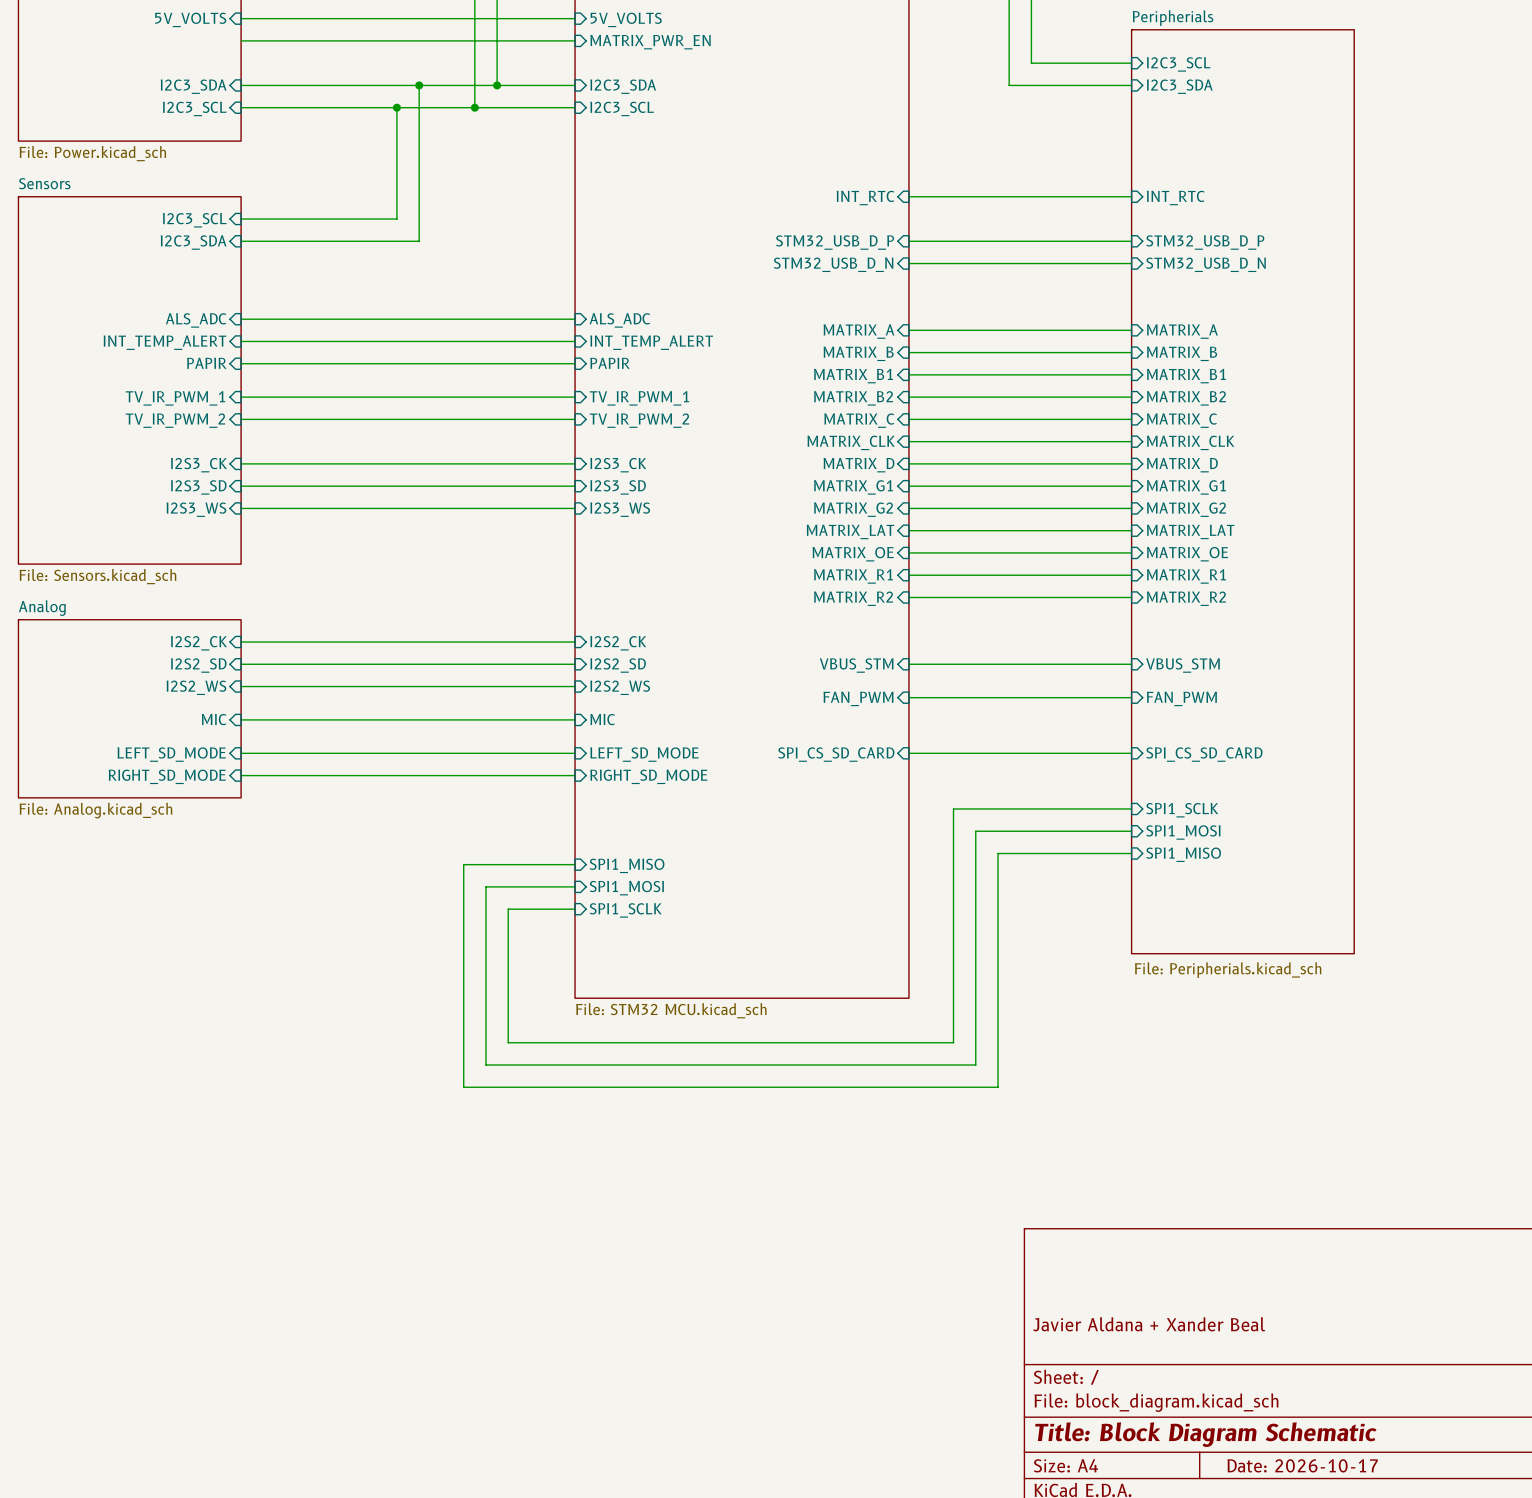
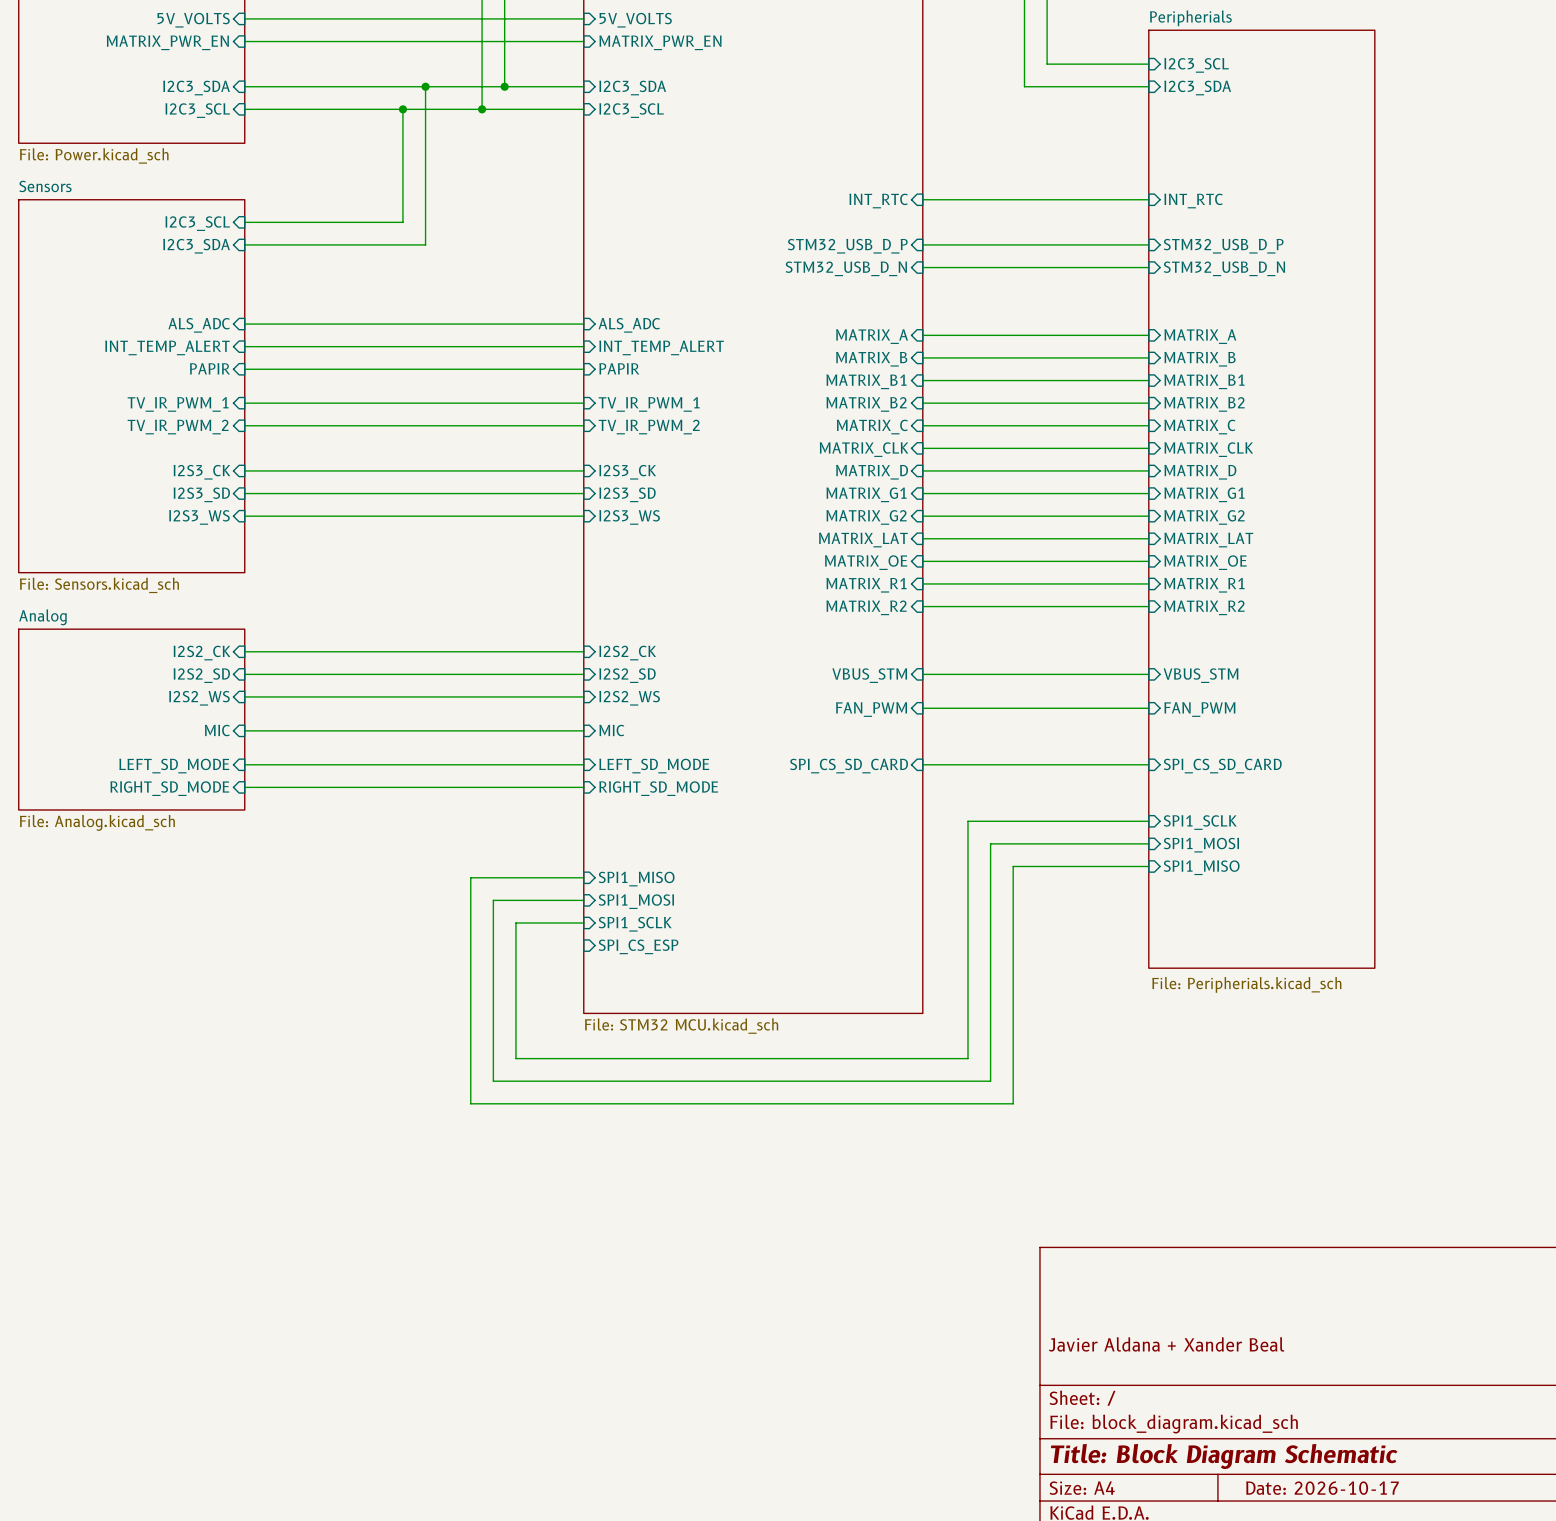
sheet pin: none -> MATRIX_PWR_EN (167, 42)
sheet pin: none -> SPI_CS_ESP (638, 946)

